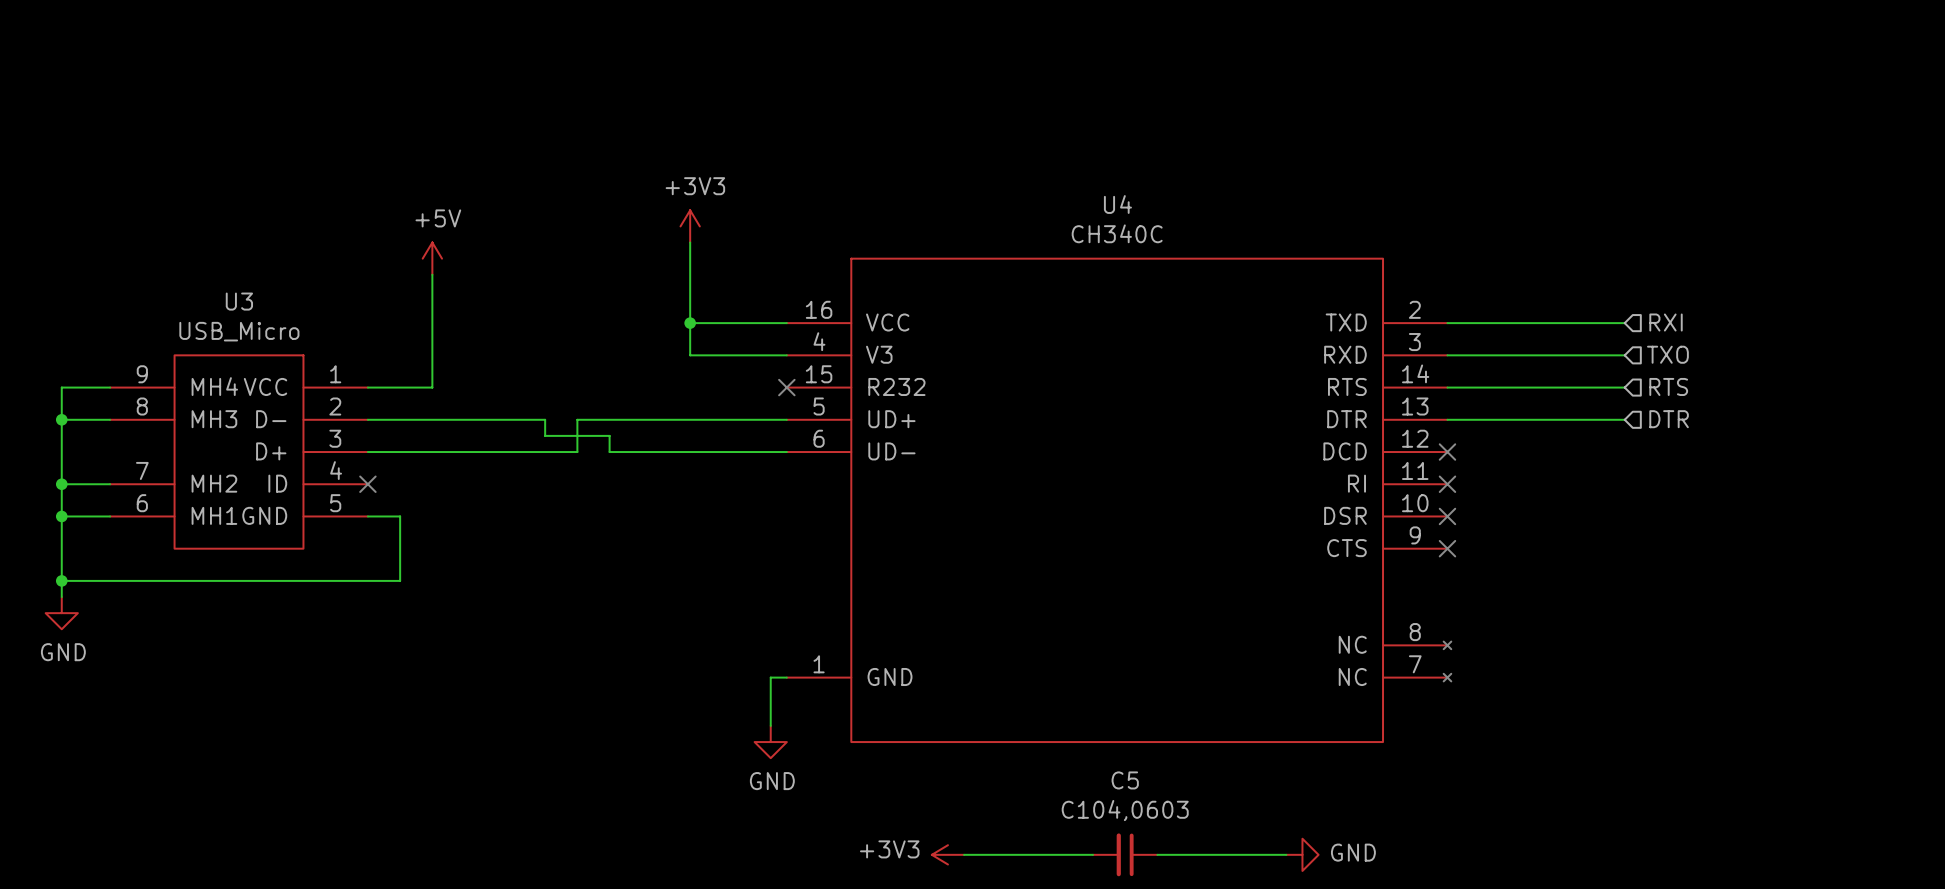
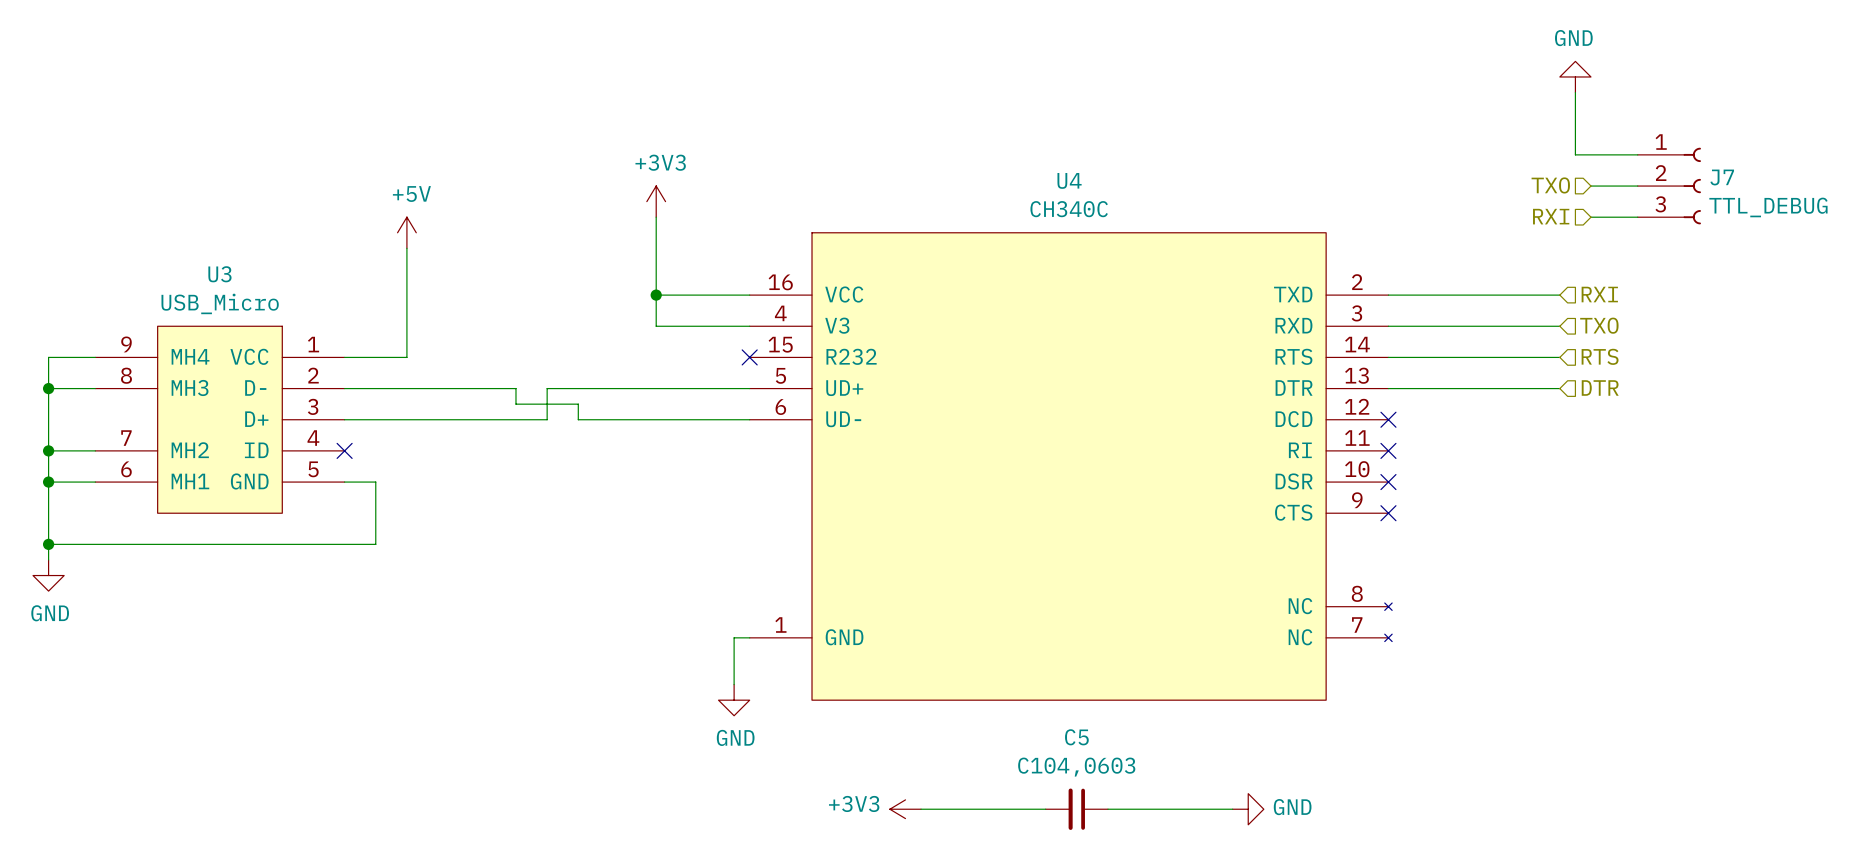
power symbol: none -> GND (1575, 76)
wire: none -> (1575, 92) (1575, 154) (1637, 154)
hierarchical label: none -> TXO (1550, 185)
wire: none -> (1590, 186) (1637, 186)
J7: none -> TTL_DEBUG (1669, 186)
hierarchical label: none -> RXI (1551, 216)
wire: none -> (1590, 217) (1637, 217)

